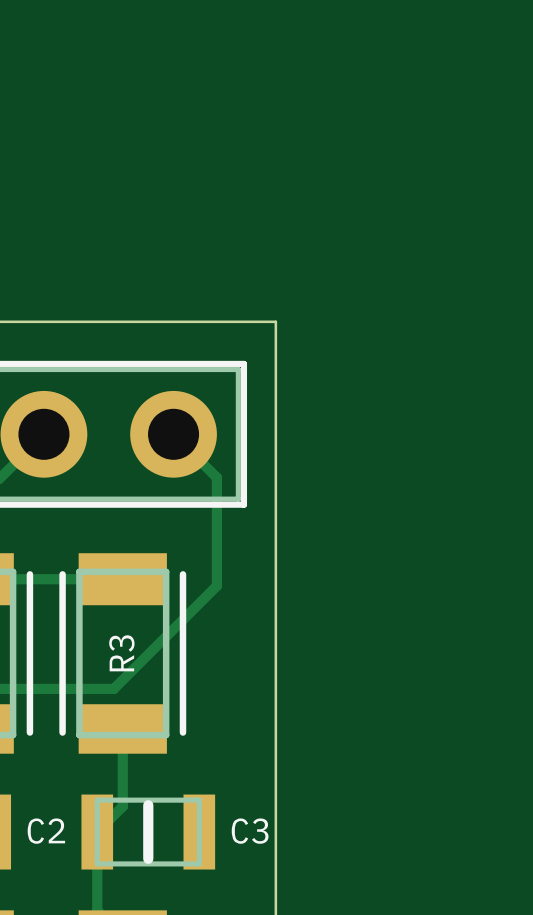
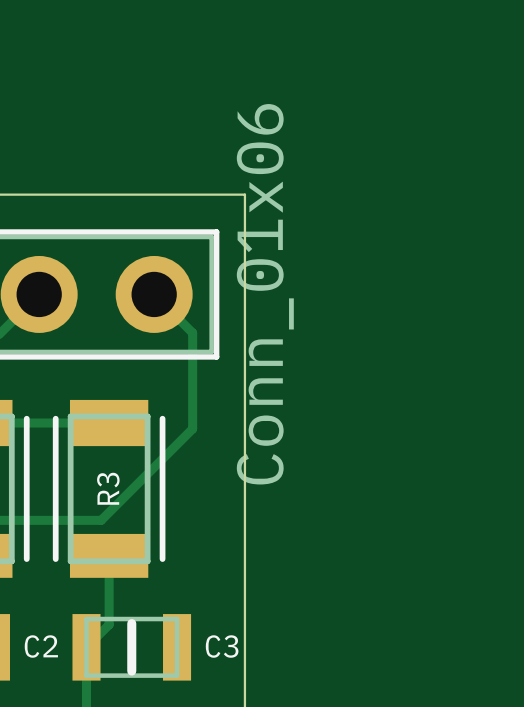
part value: none -> Conn_01x06 (265, 294)

